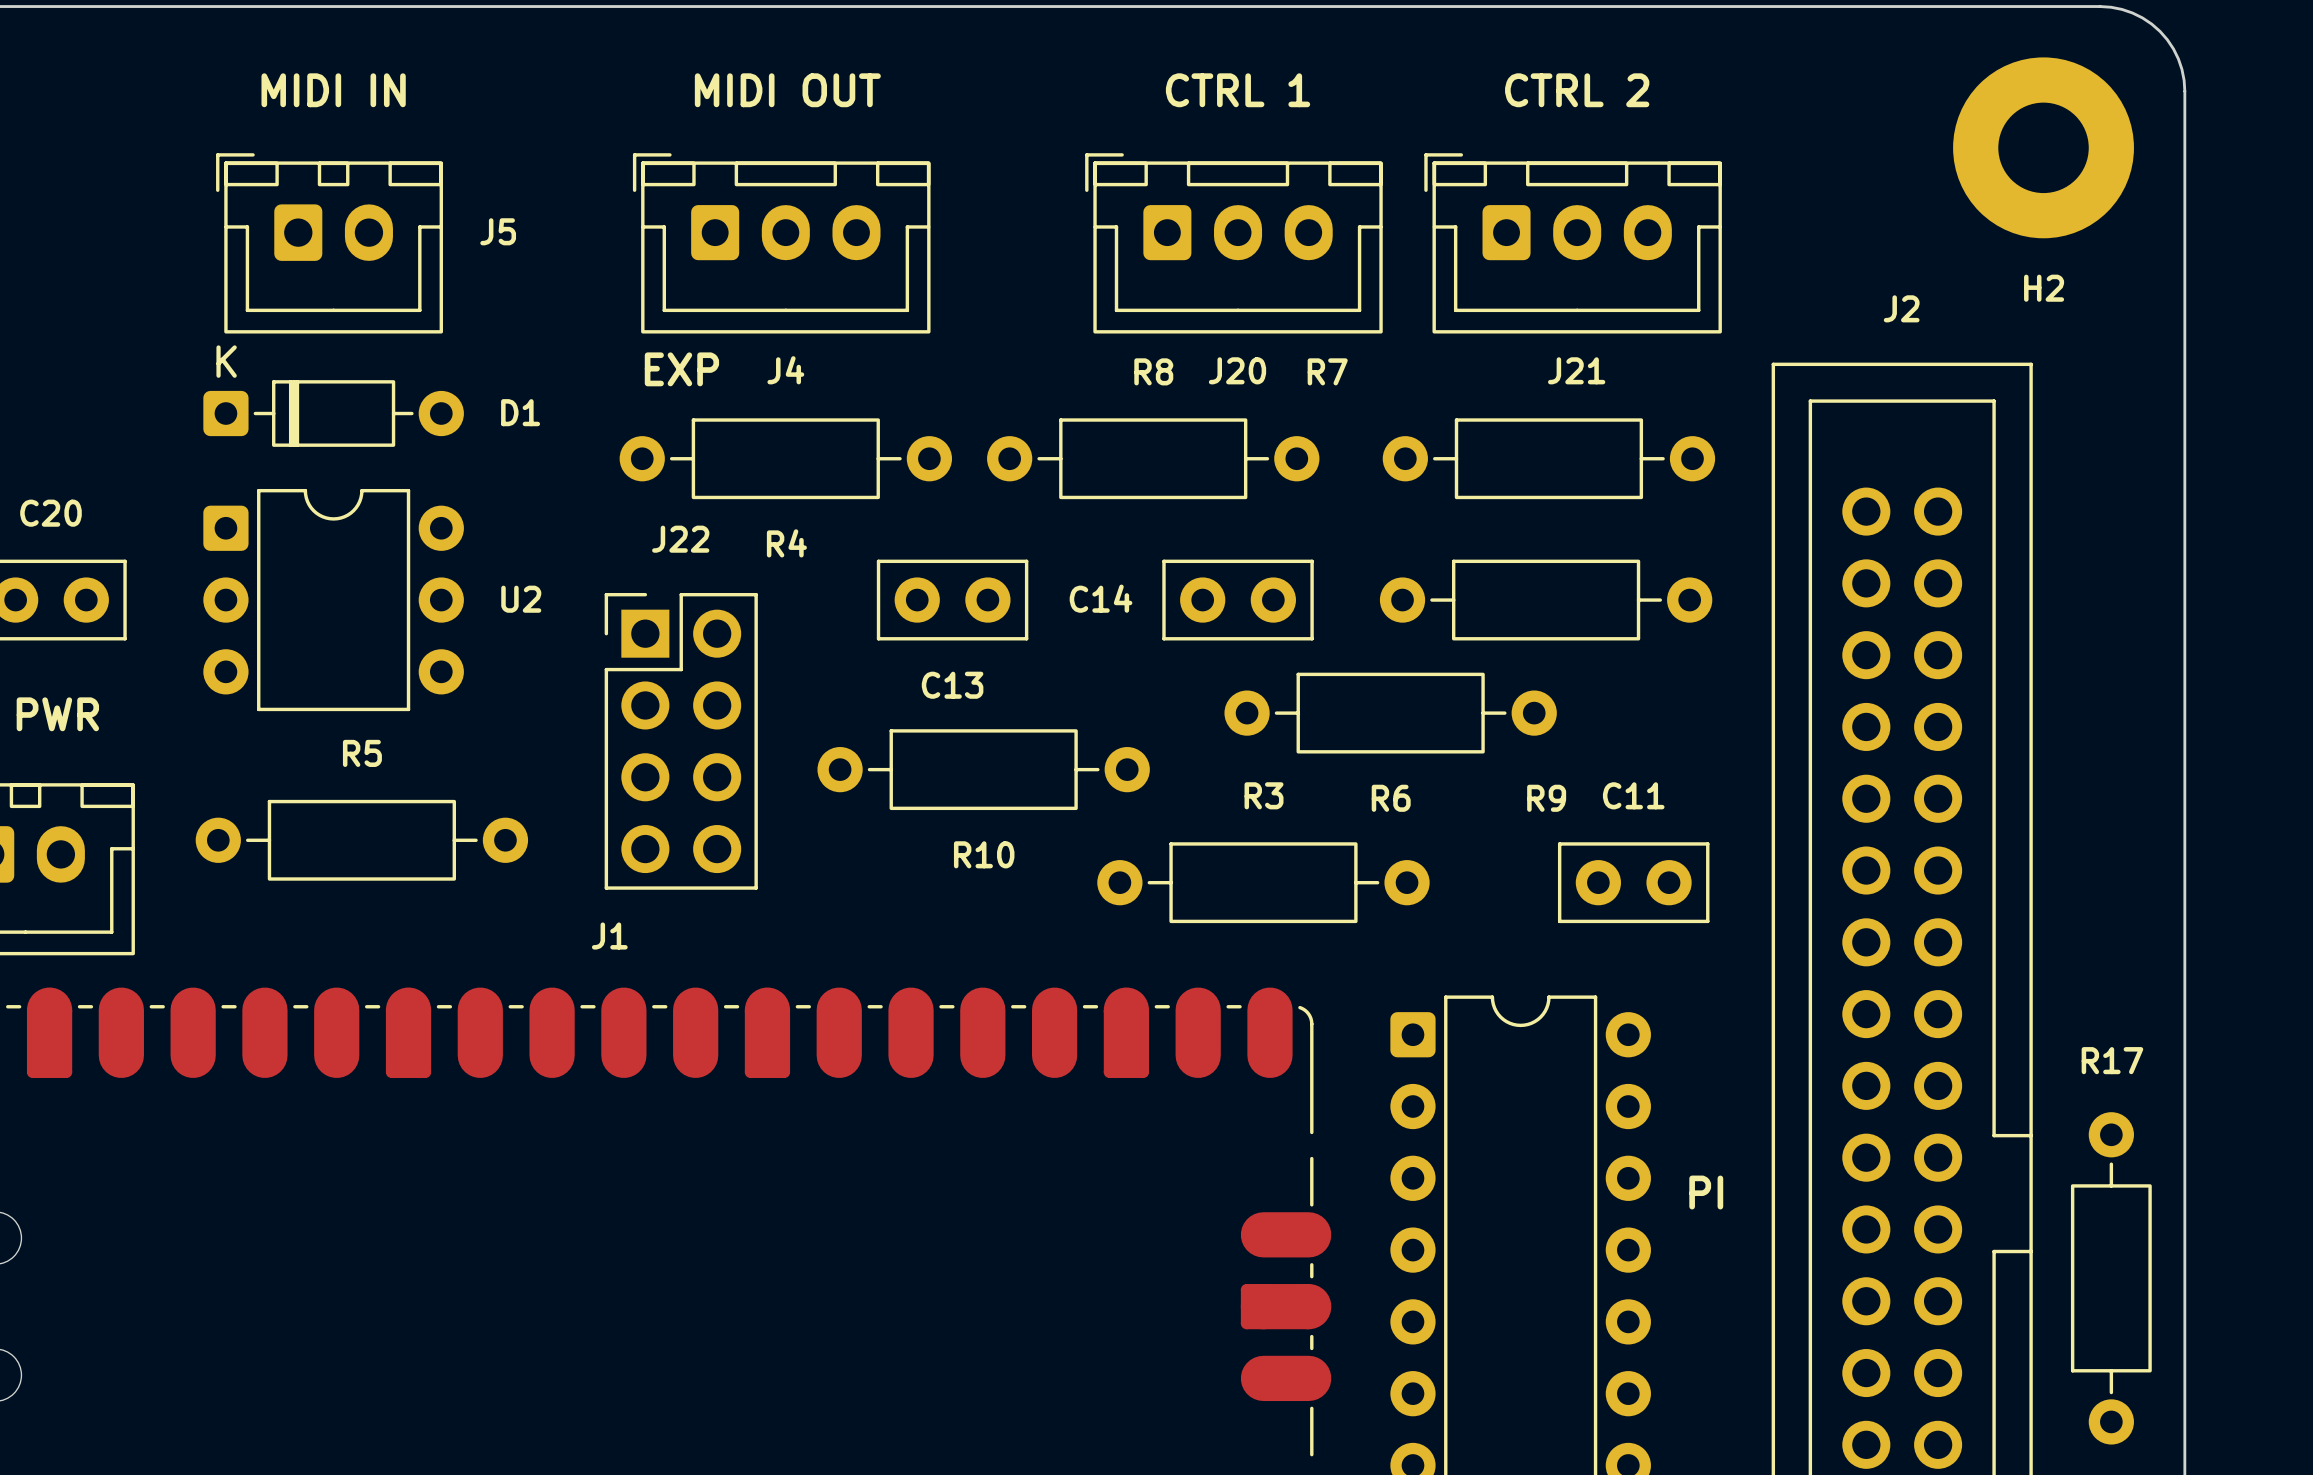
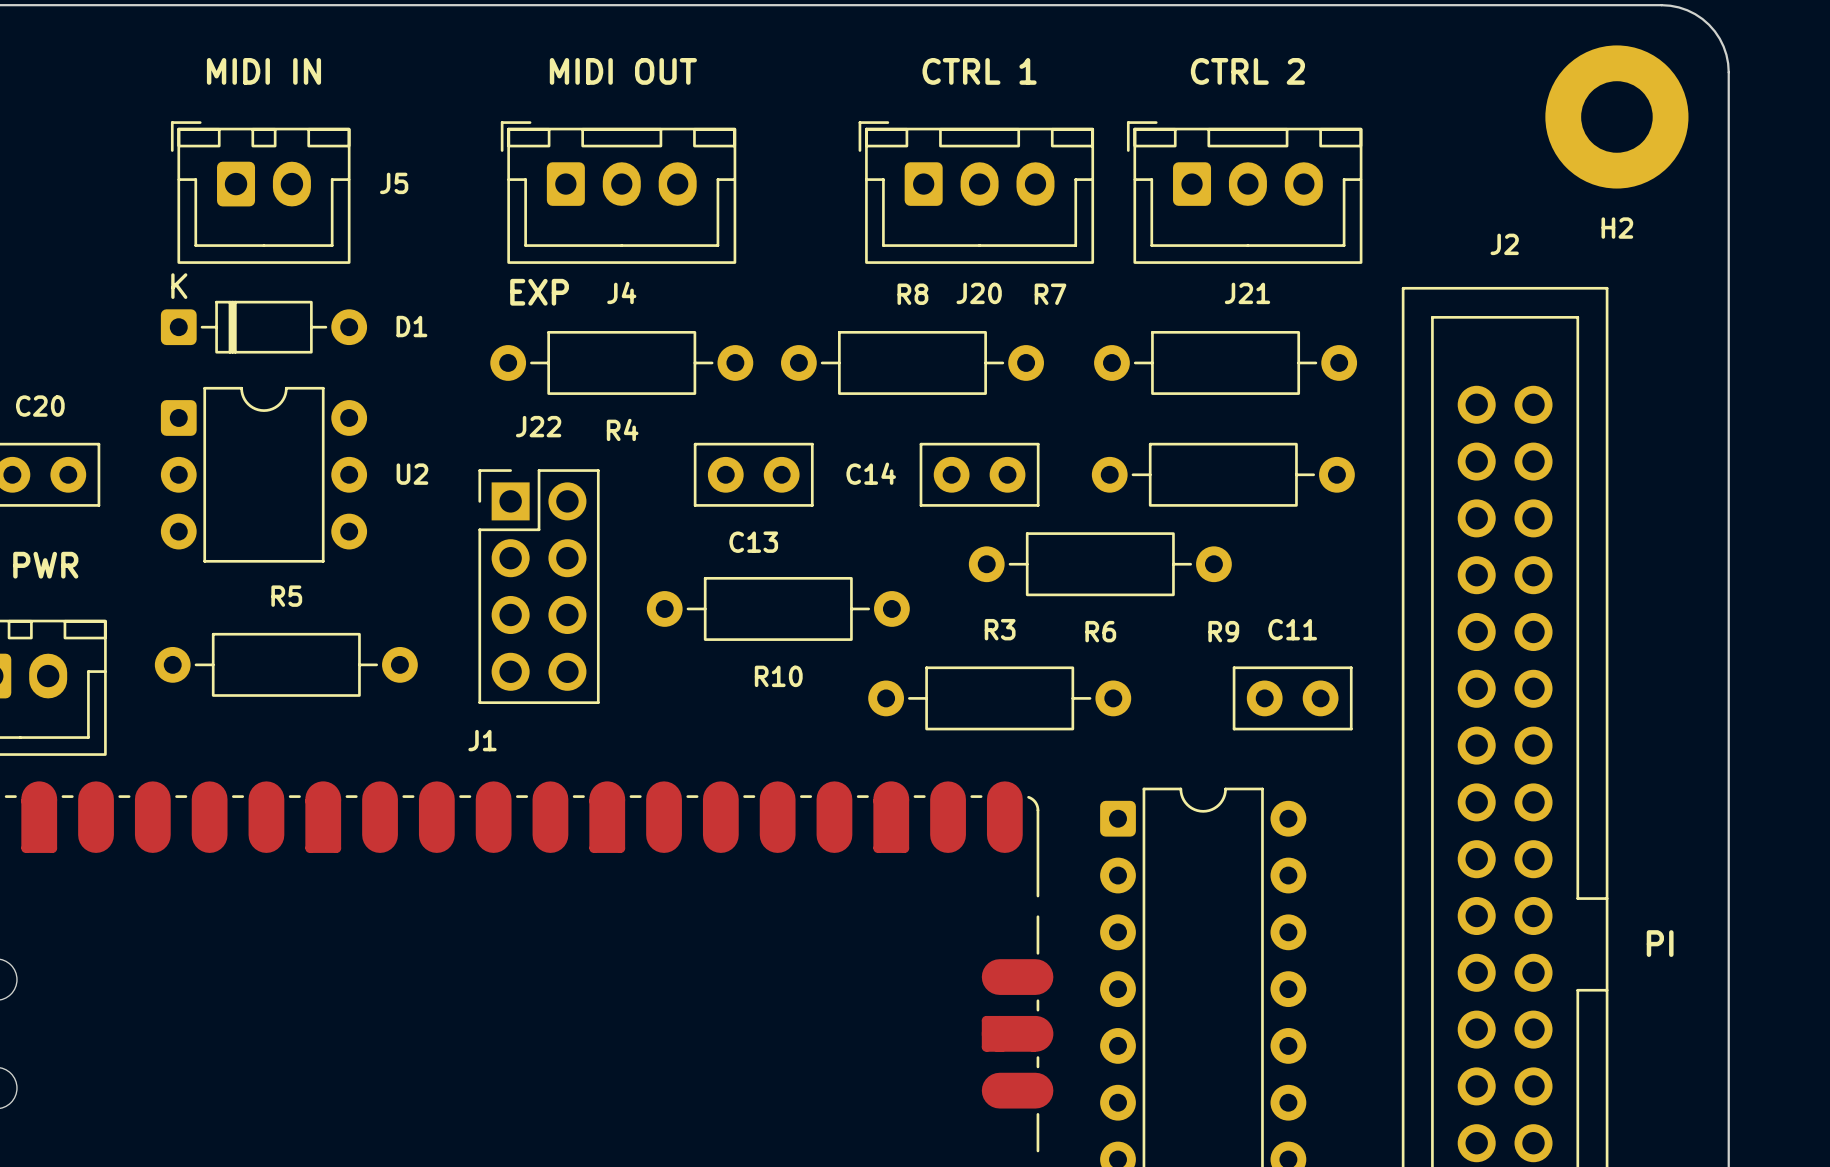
text position: PI (1706, 1192) -> PI (1660, 943)
R17: (2111, 1278) -> none

